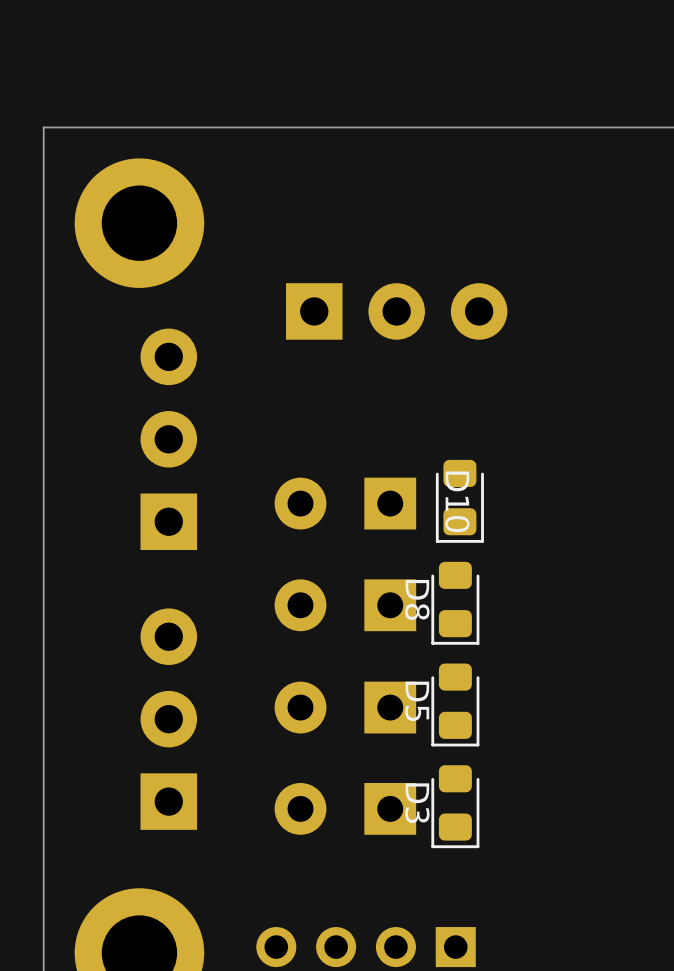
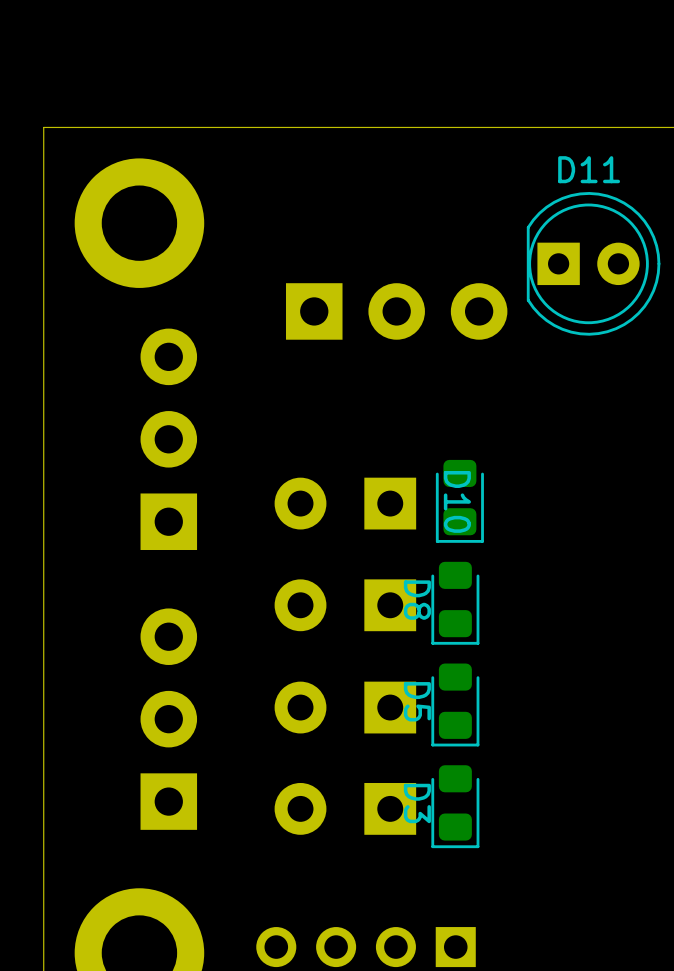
D11: none -> (593, 263)

